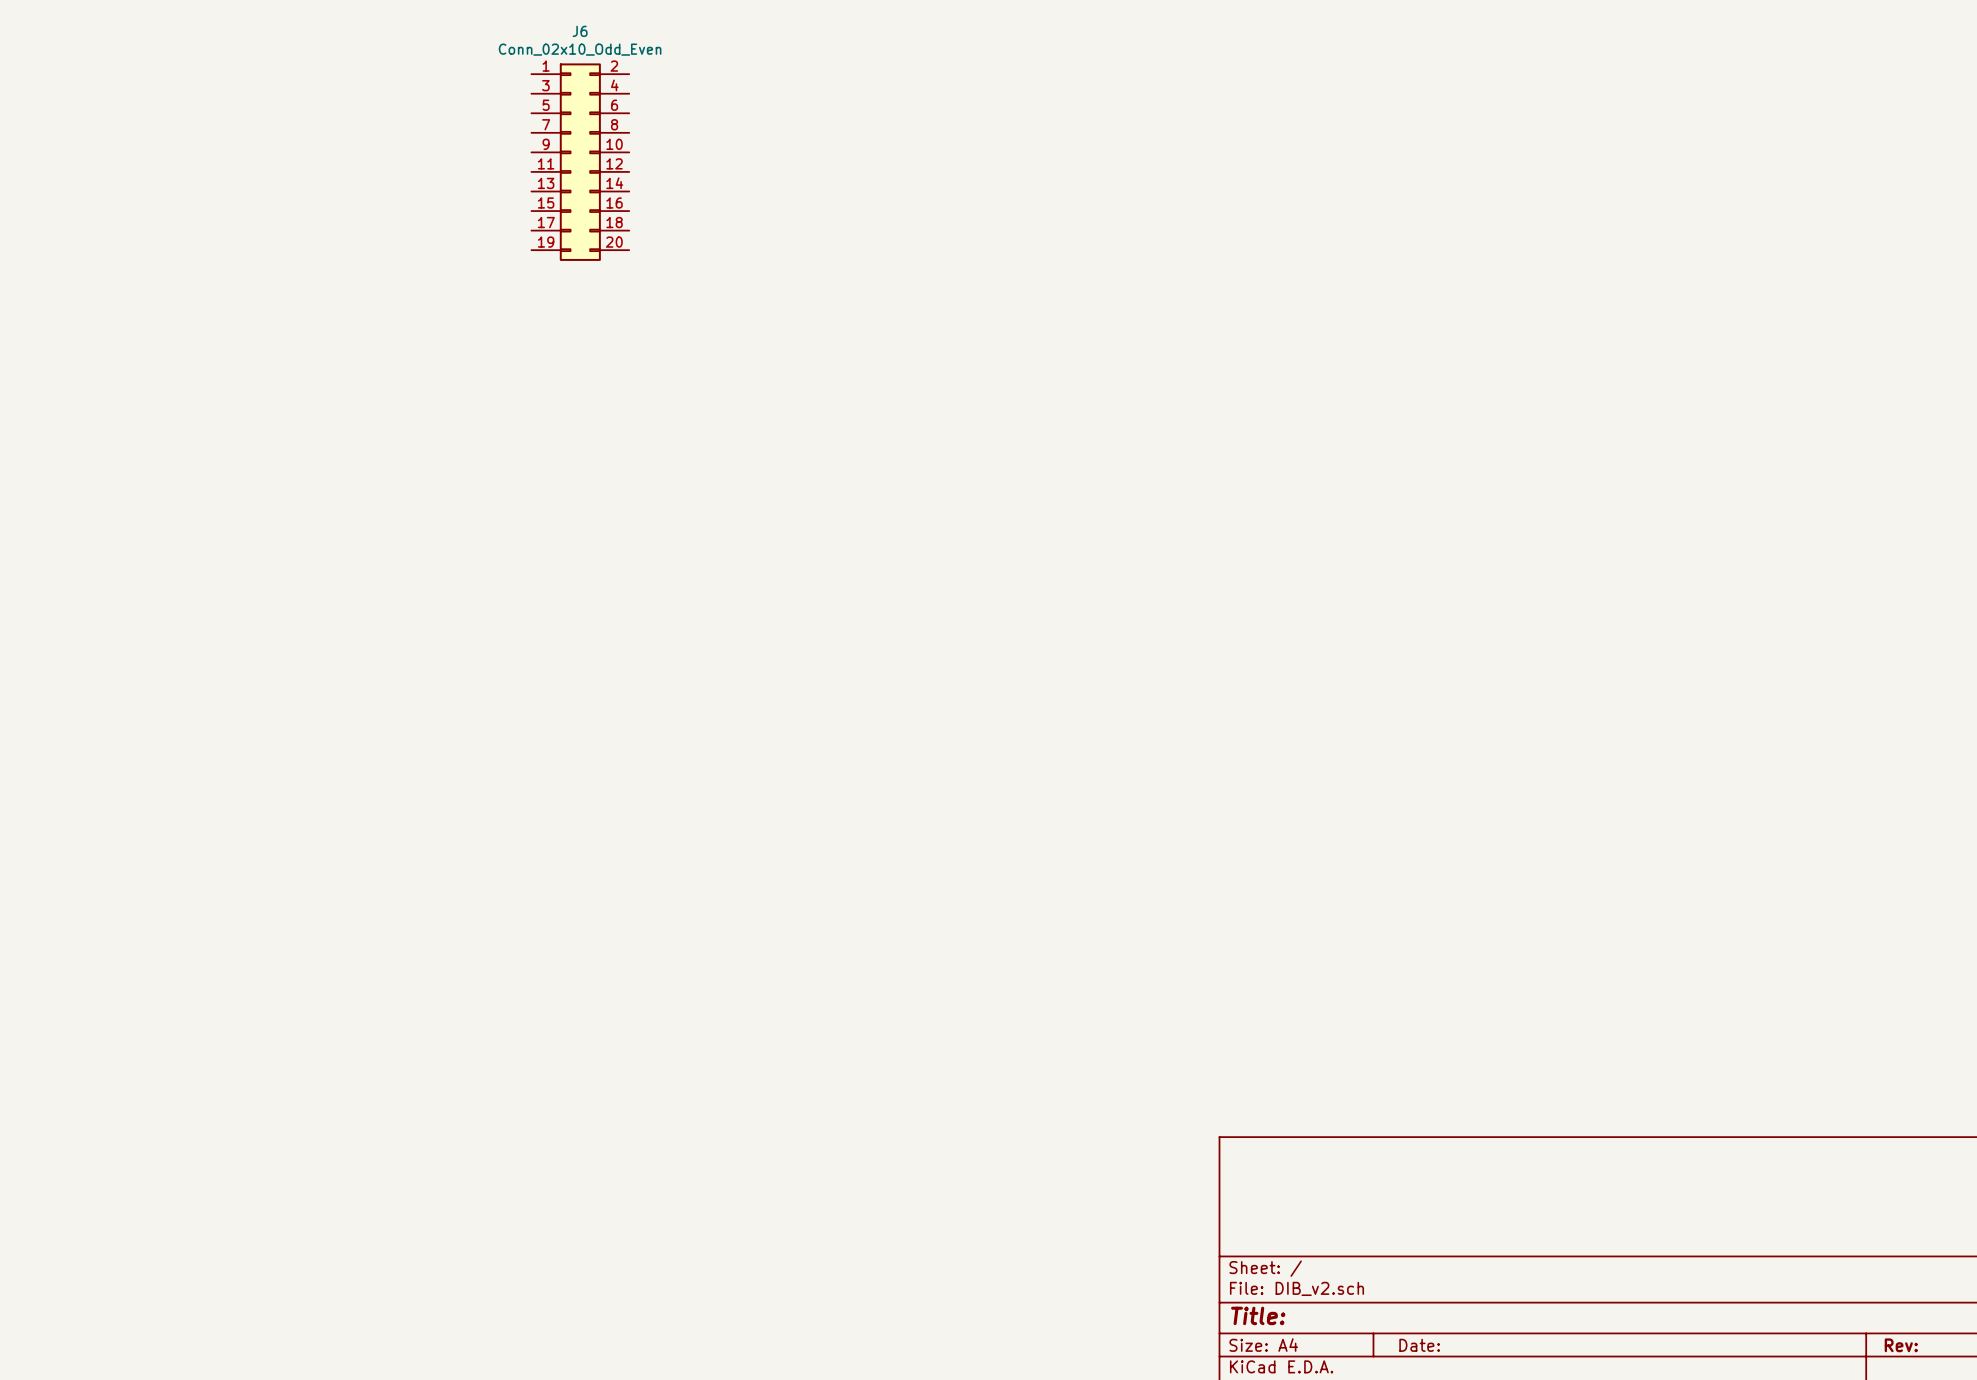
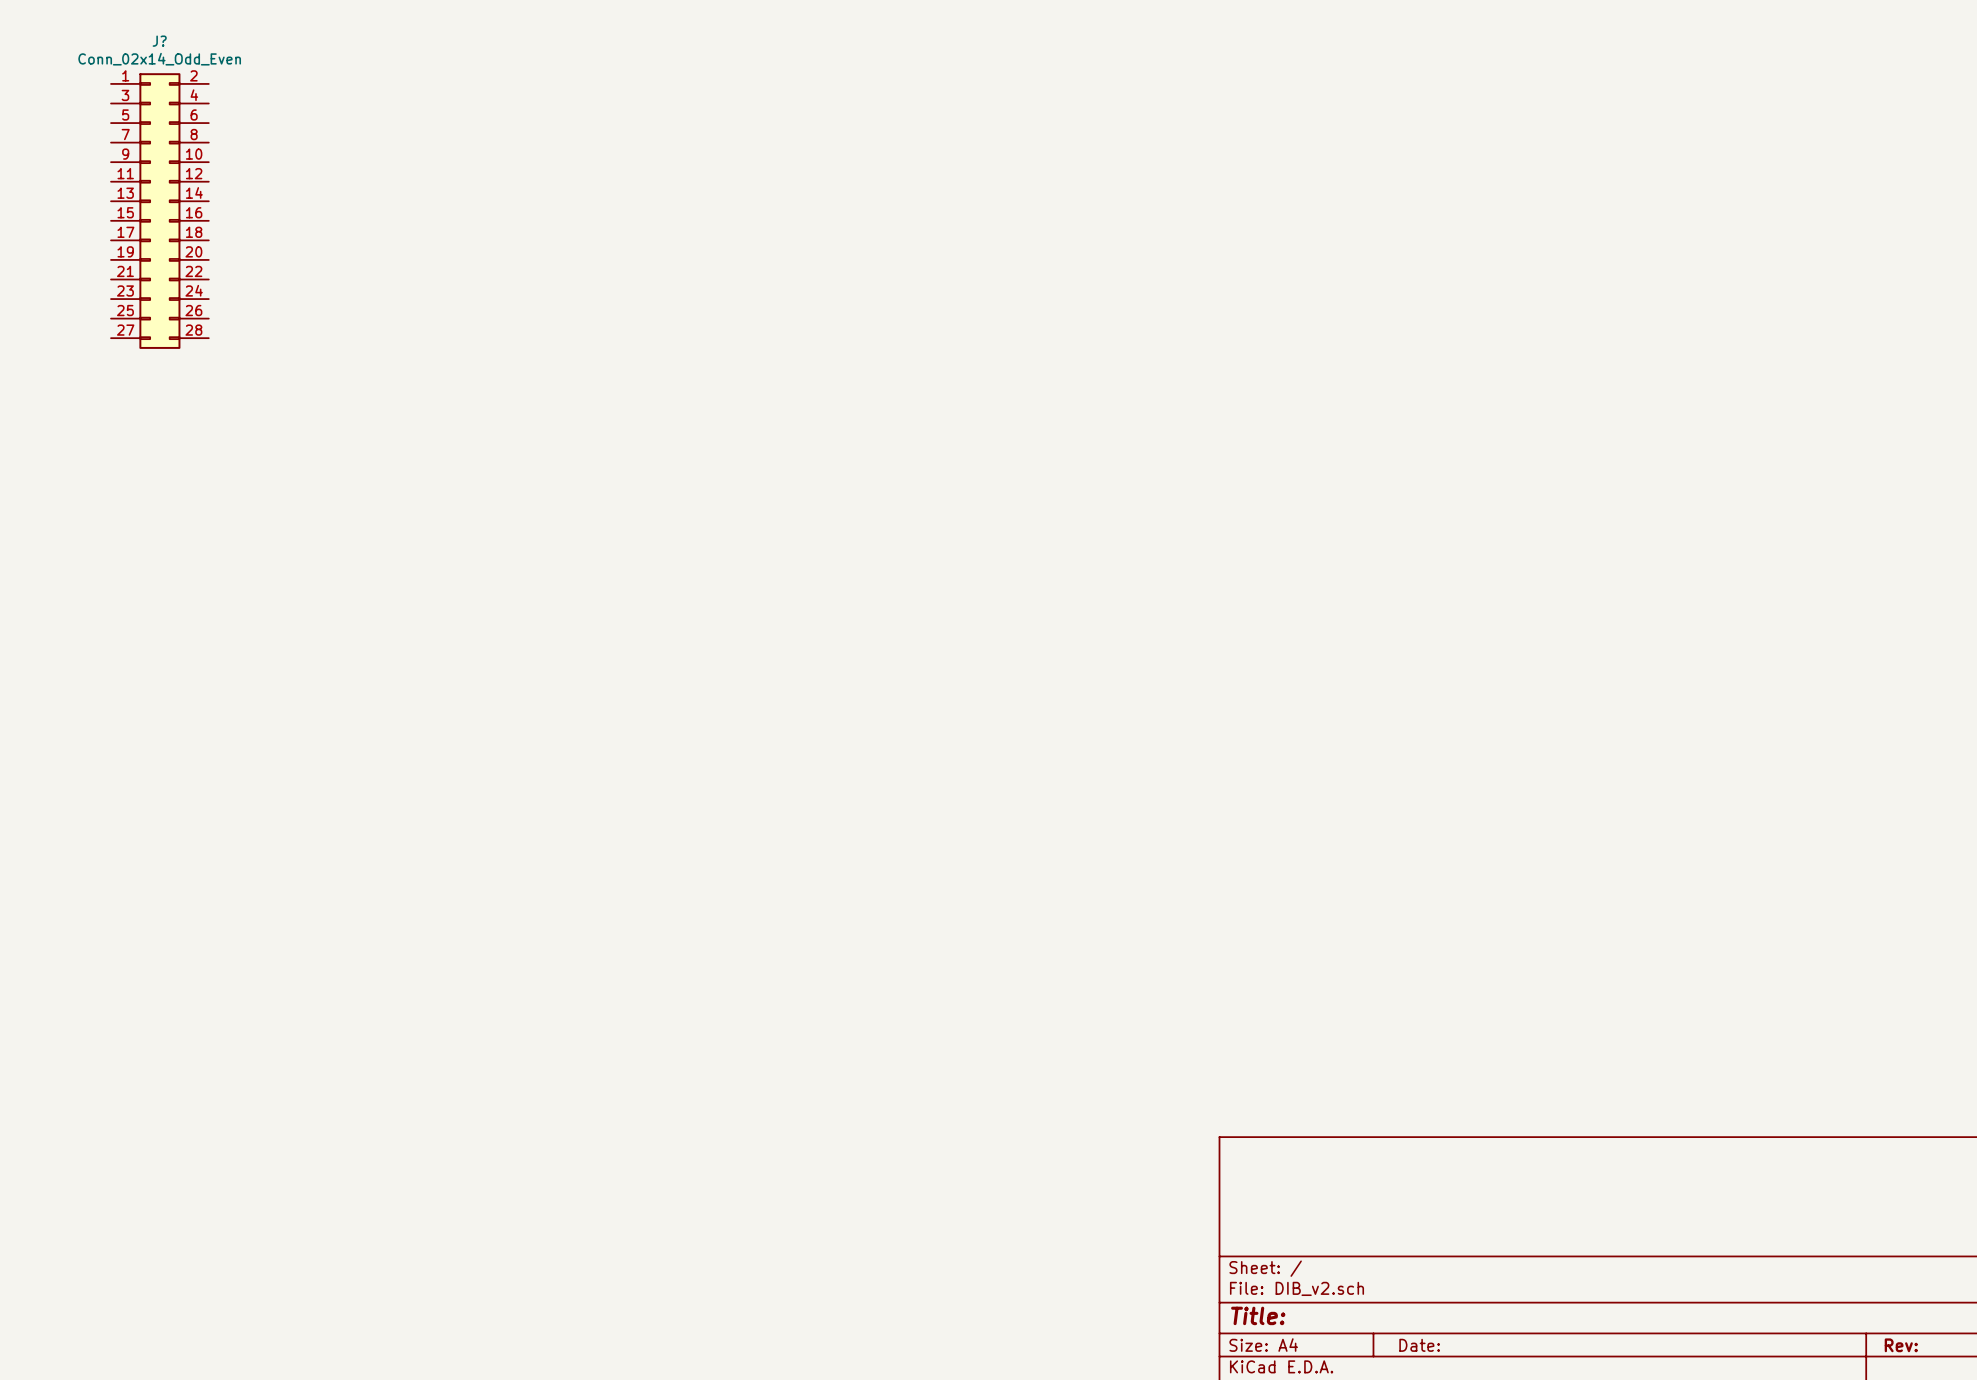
J6: Conn_02x10_Odd_Even (580, 162) -> none
J?: none -> Conn_02x14_Odd_Even (159, 211)

